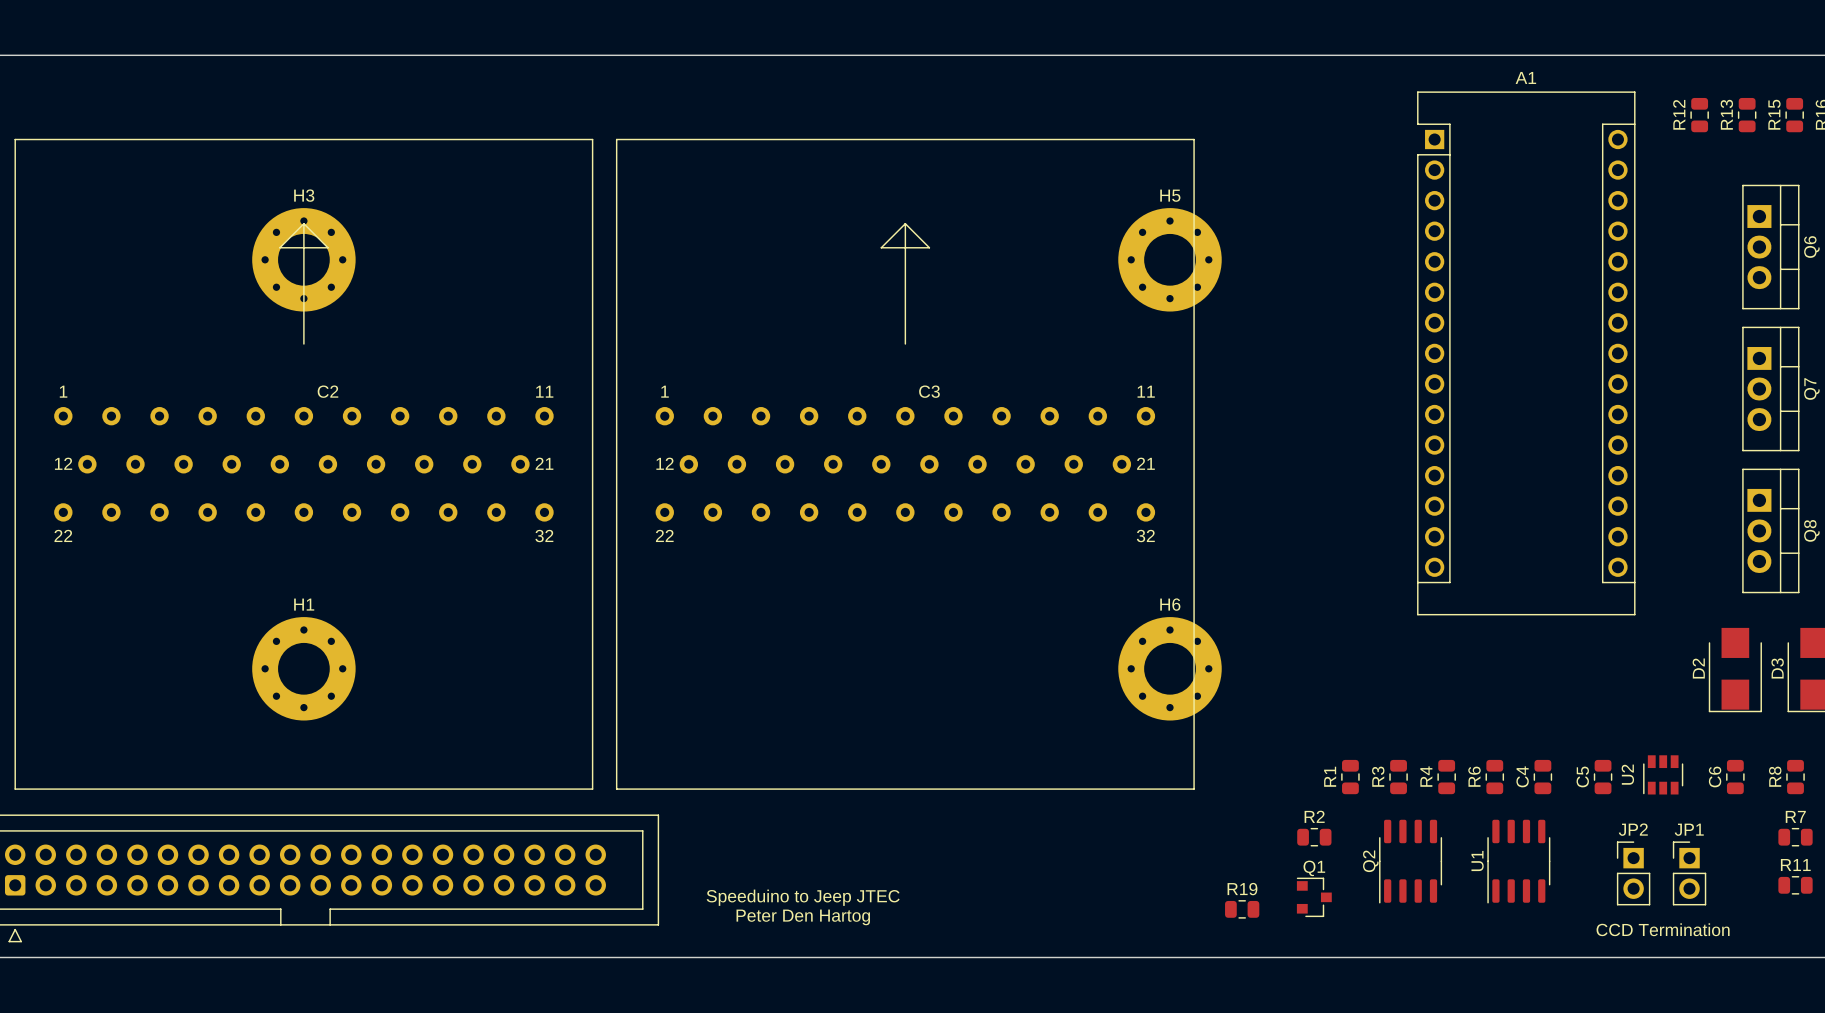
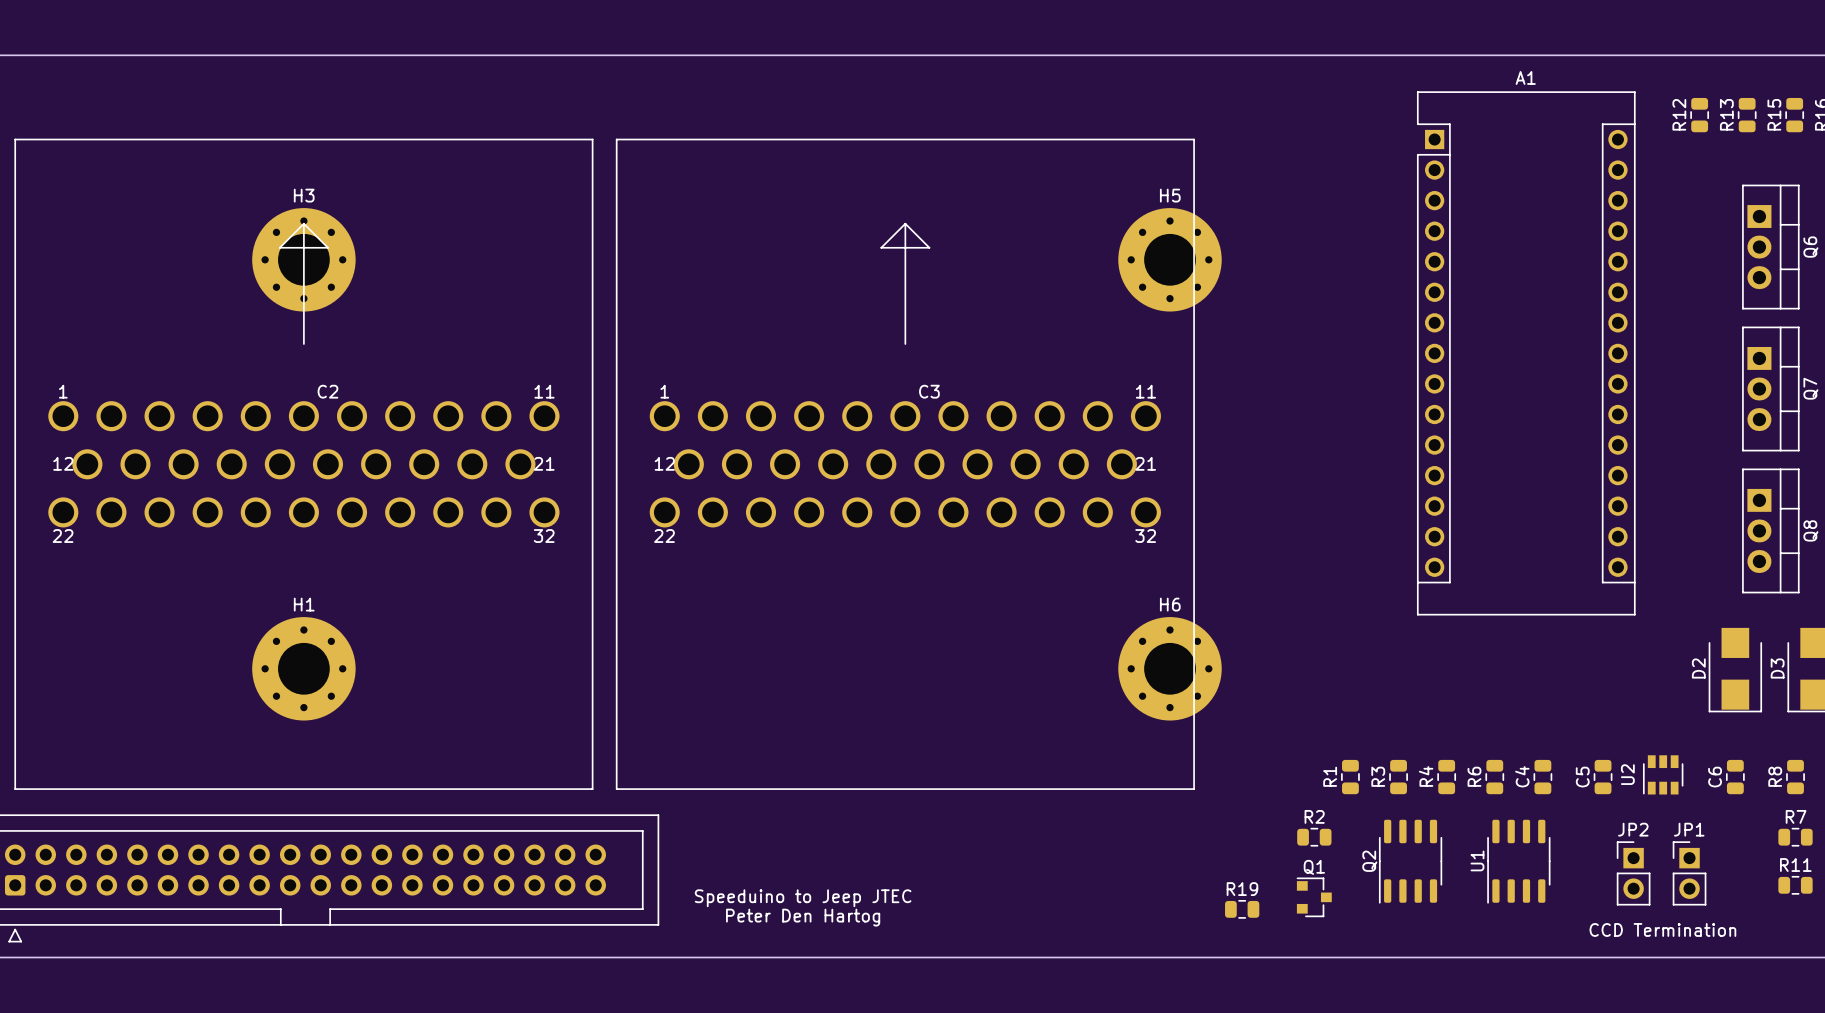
C2 footprint: [14, 138, 594, 790] -> [14, 138, 594, 790]
C3 footprint: [615, 138, 1195, 790] -> [615, 138, 1195, 790]

